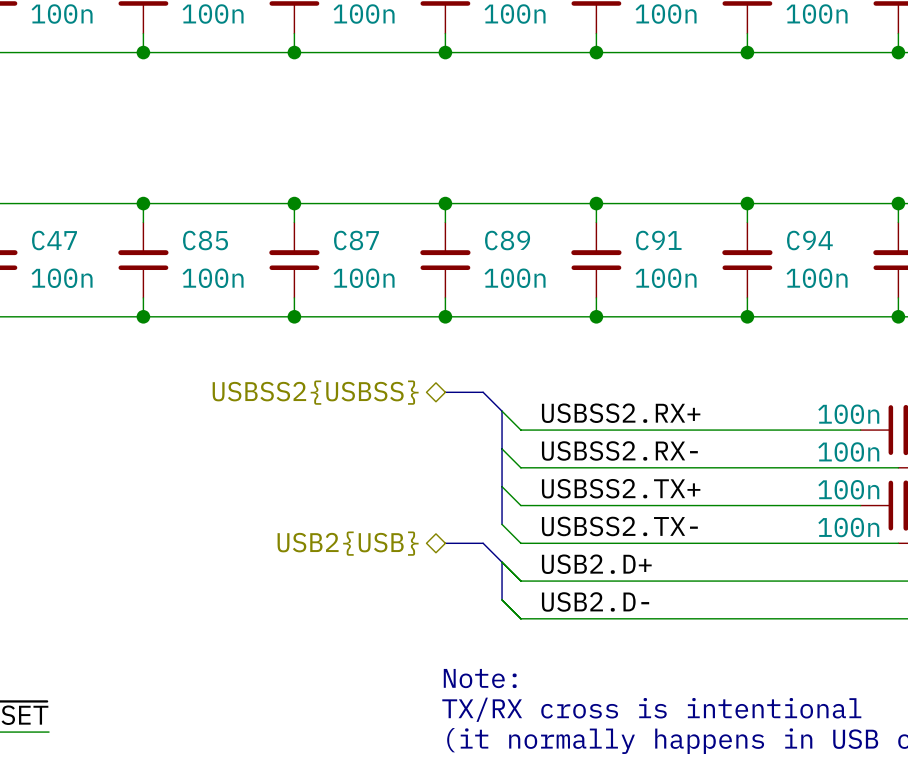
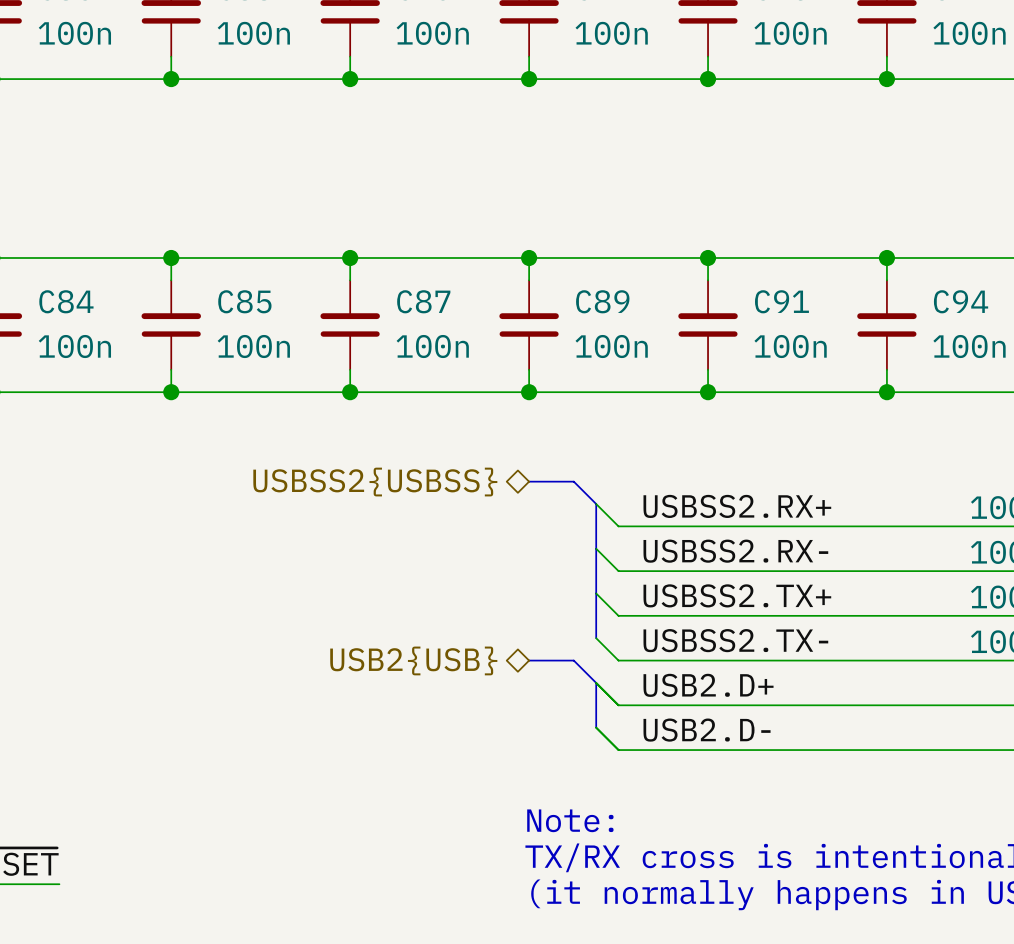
C47 name: C47 (54, 240) -> C84 (66, 301)

